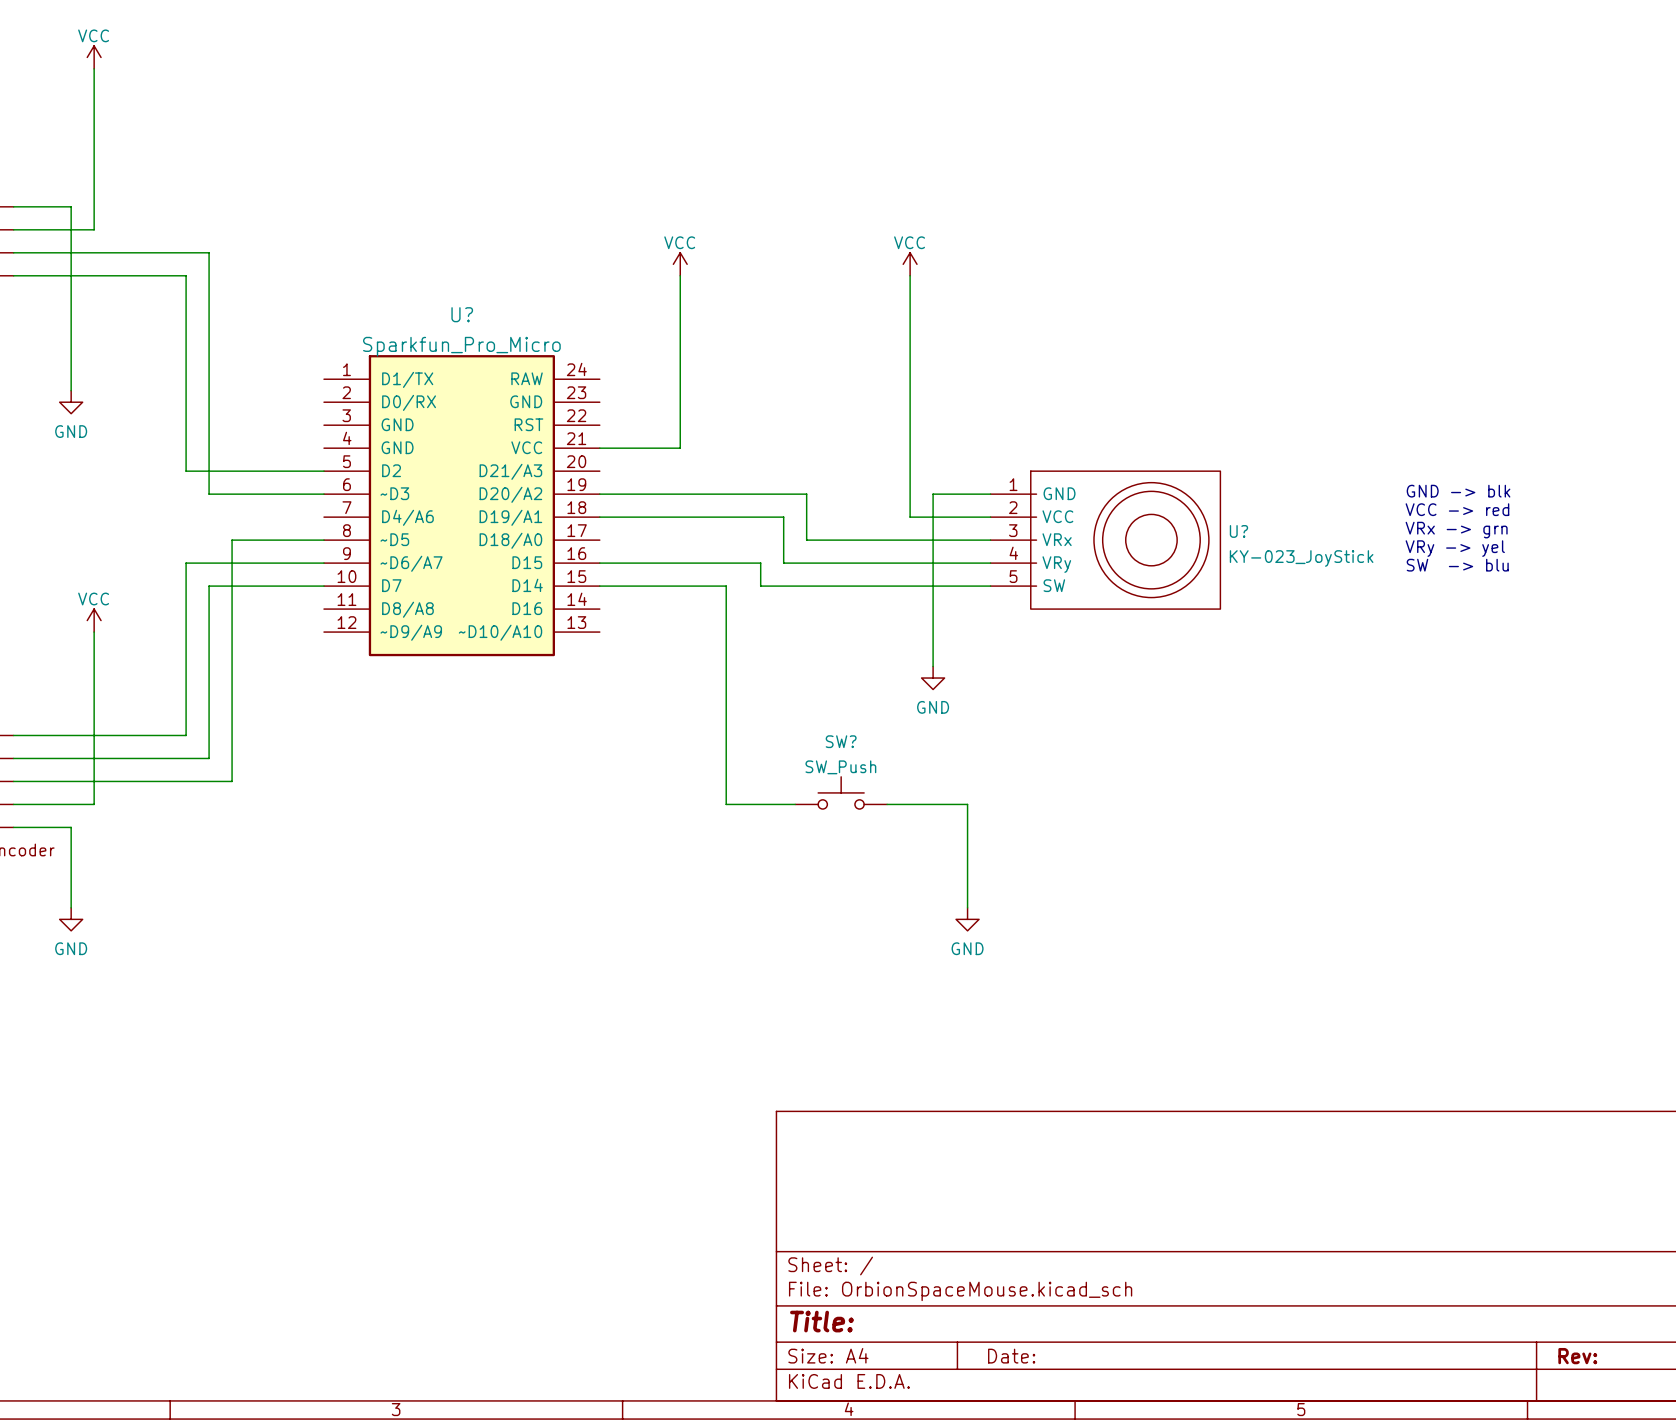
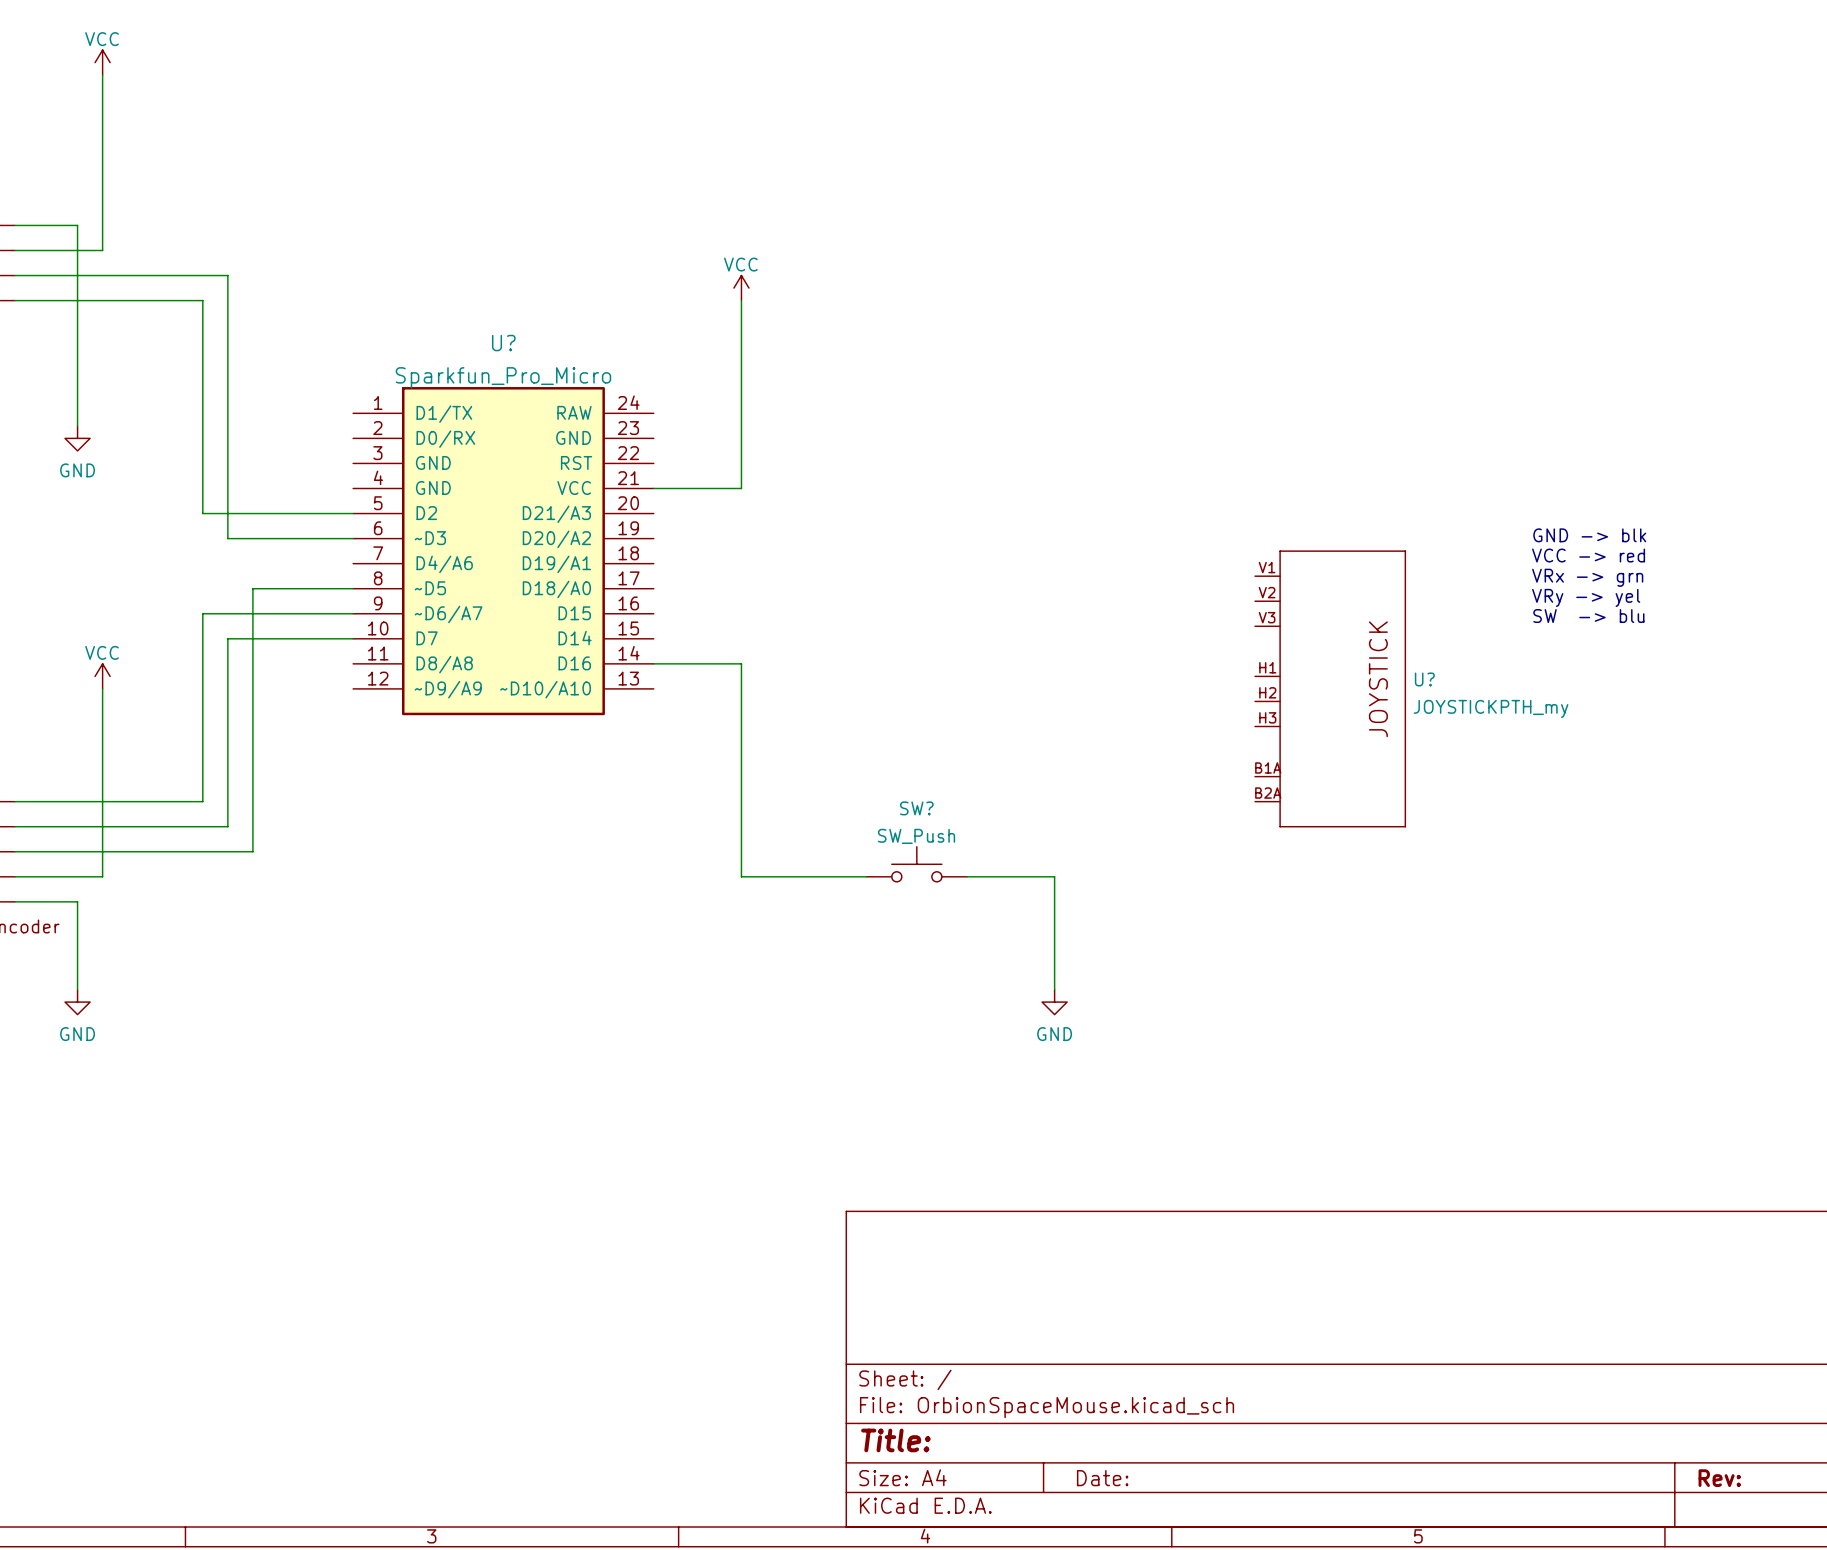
power symbol: VCC (910, 264) -> none
wire: (910, 275) (910, 517) (990, 517) -> none
wire: (599, 494) (806, 494) (806, 540) (990, 540) -> none
wire: (990, 494) (933, 494) (933, 666) -> none
wire: (599, 517) (783, 517) (783, 563) (990, 563) -> none
U?: KY-023_JoyStick (1105, 540) -> none
wire: (599, 563) (760, 563) (760, 586) (990, 586) -> none
wire: (599, 586) (726, 586) (726, 804) -> (653, 663) (741, 663) (741, 876) (791, 876)
U?: none -> JOYSTICKPTH_my (1330, 688)
power symbol: GND (933, 678) -> none

